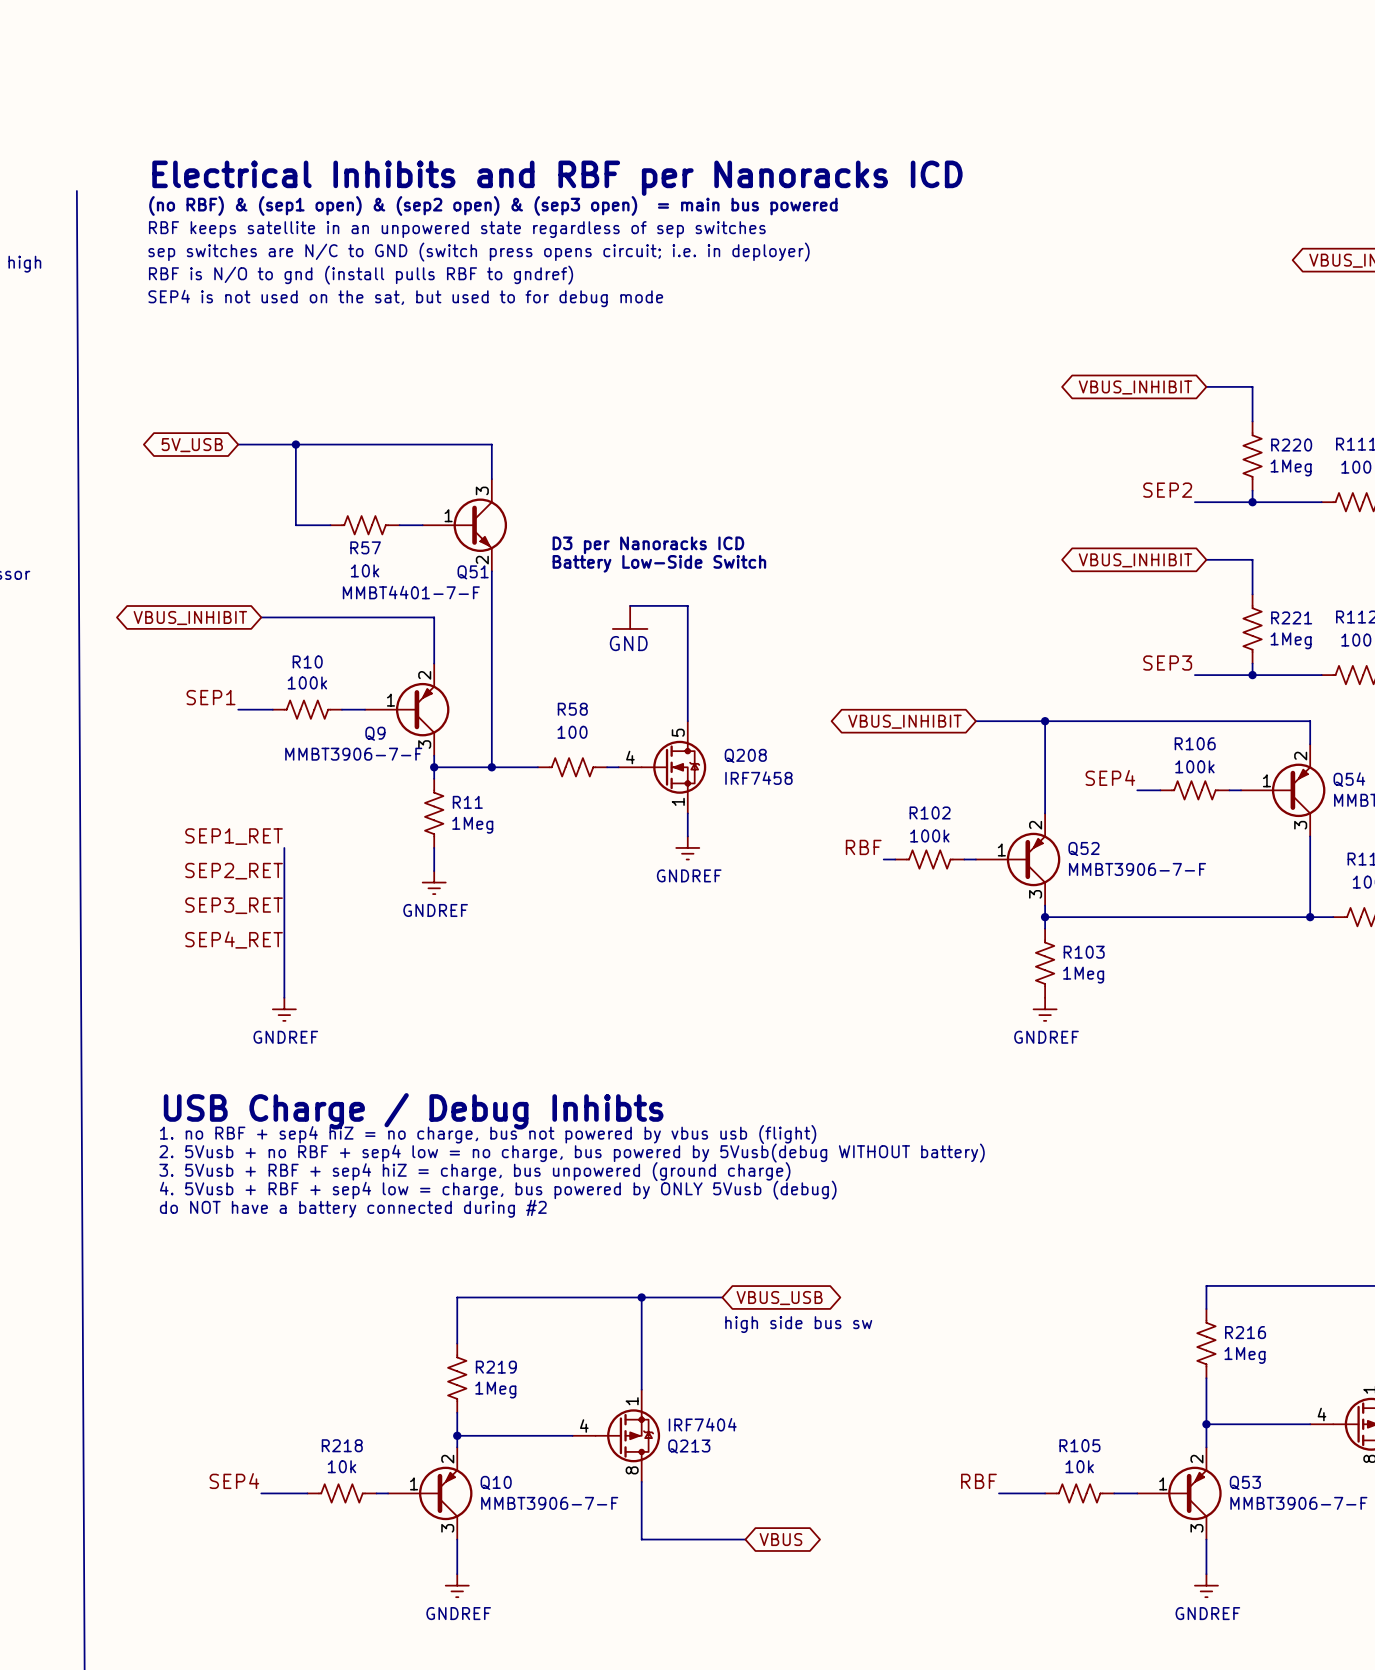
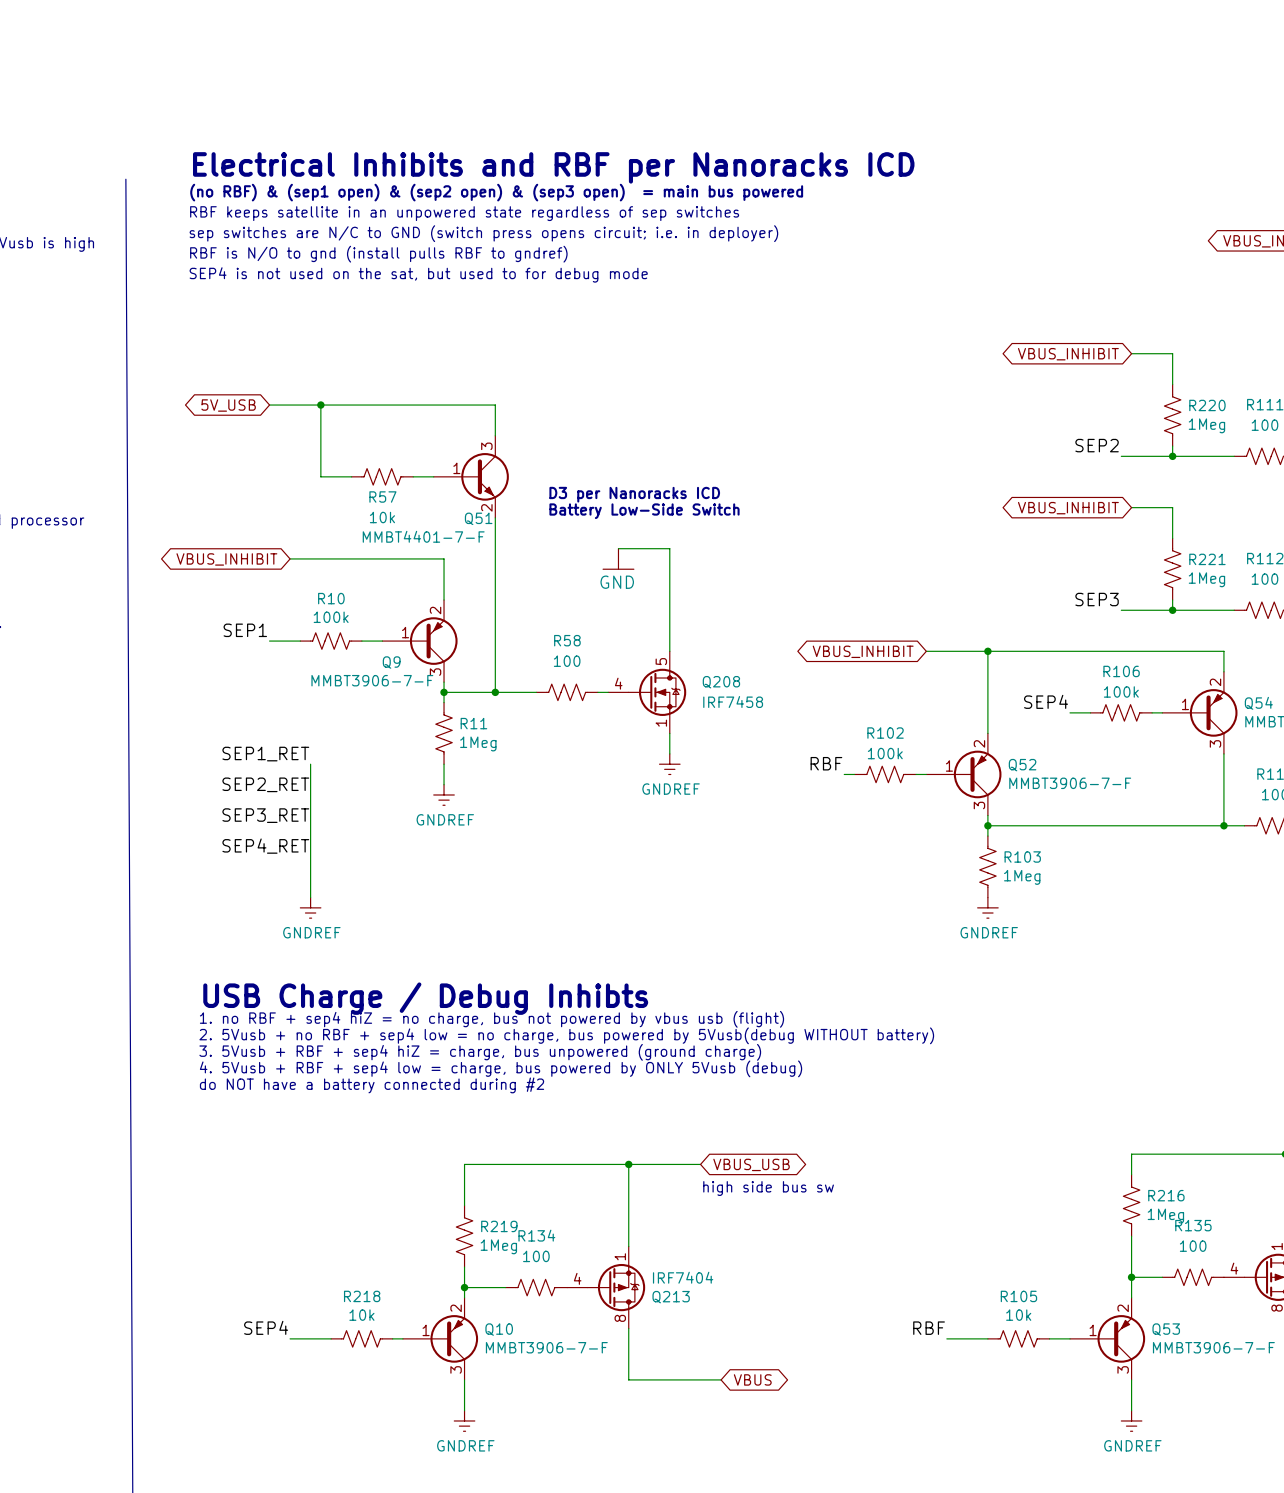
R135: none -> 100 (1193, 1277)
R134: none -> 100 (536, 1287)

